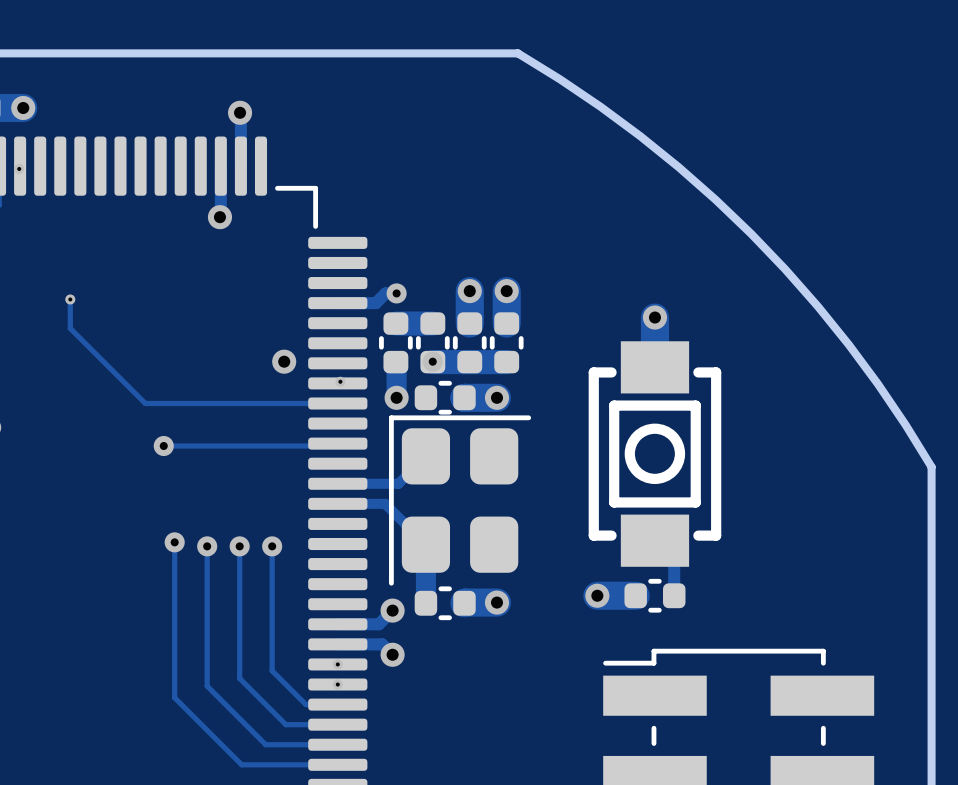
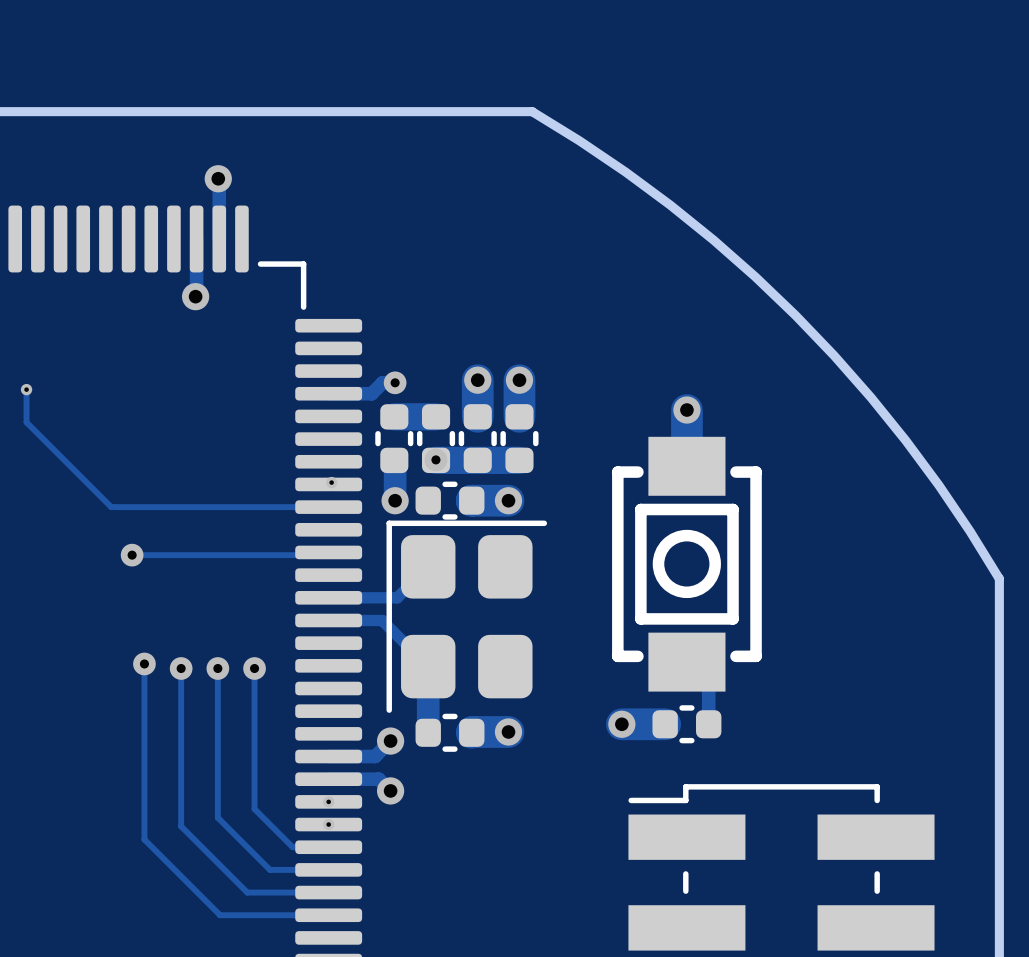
via: (284, 361) -> none

